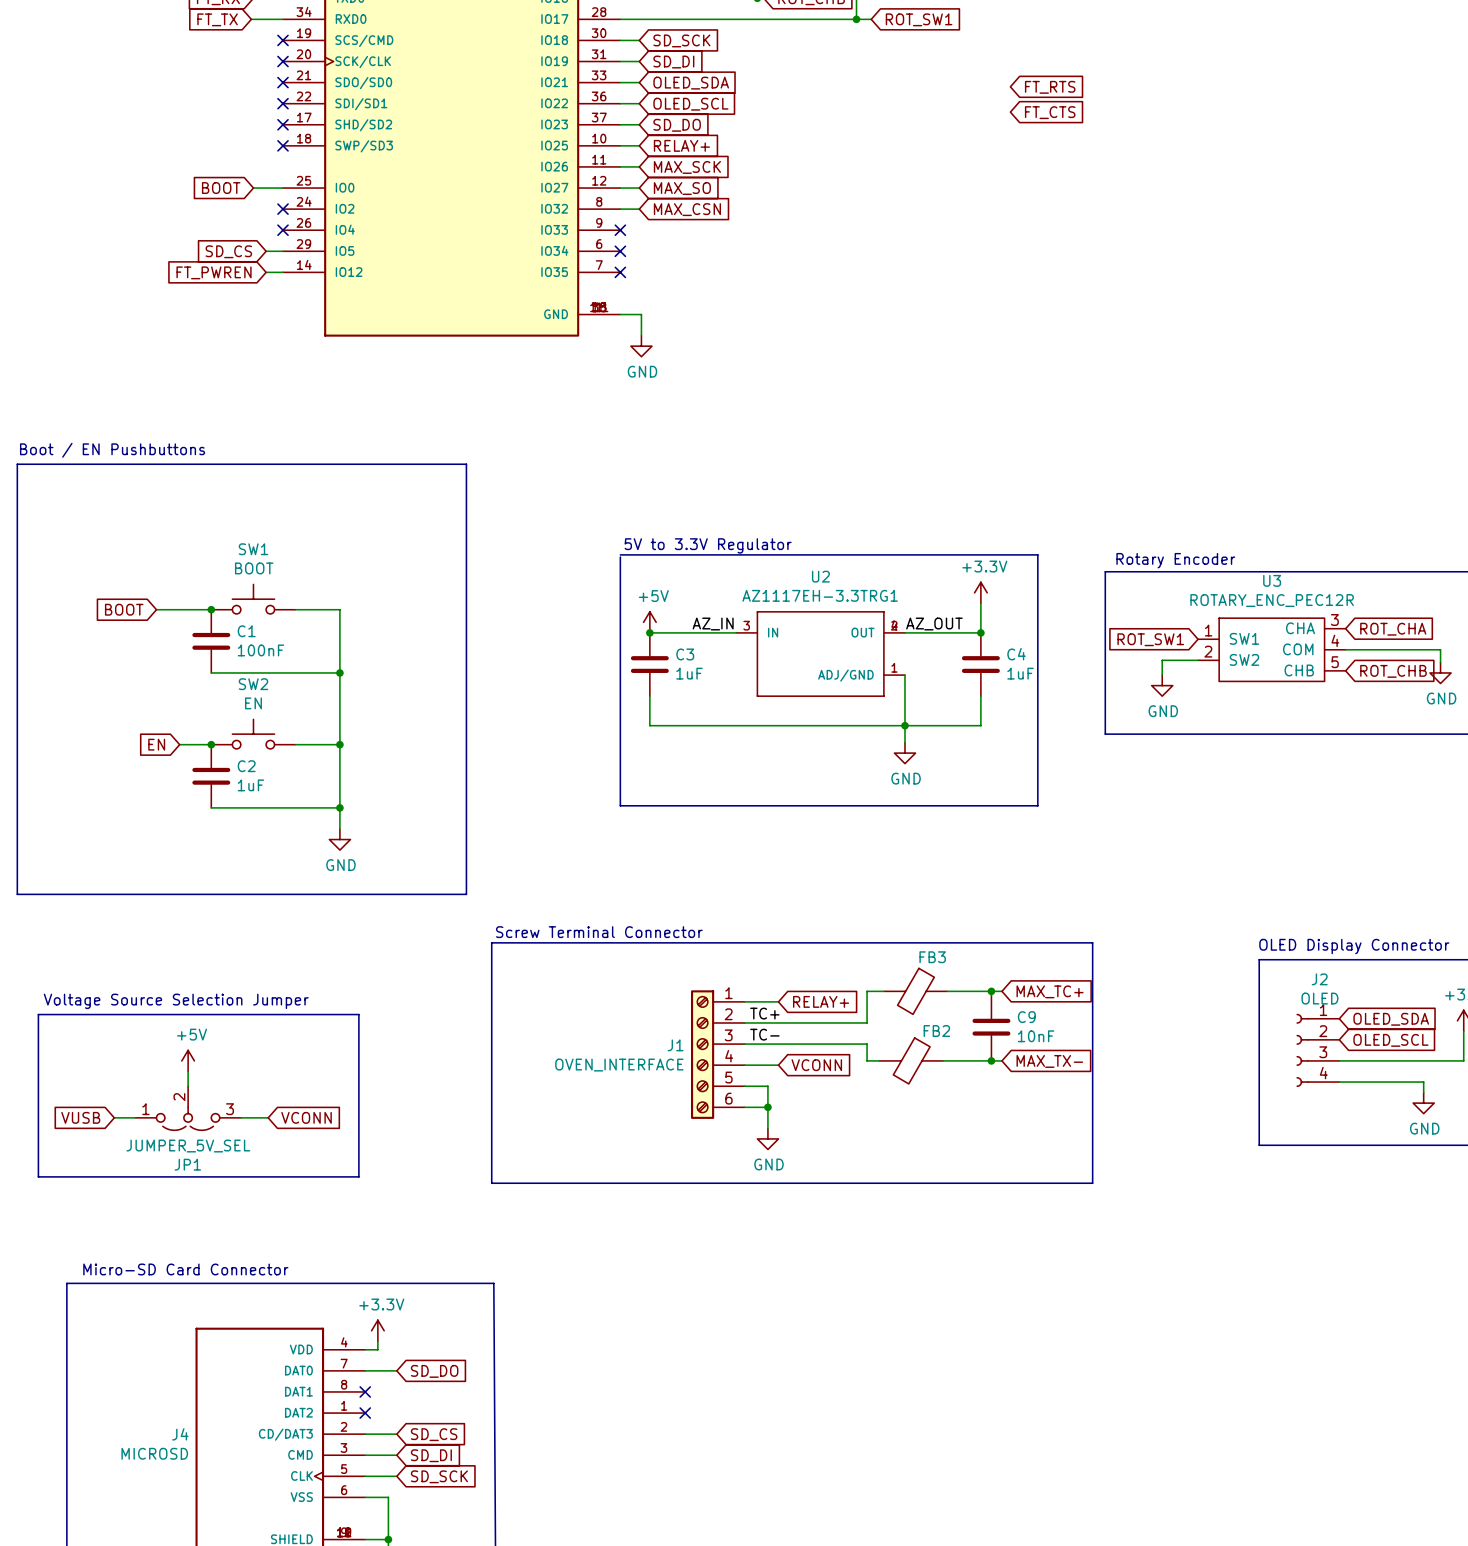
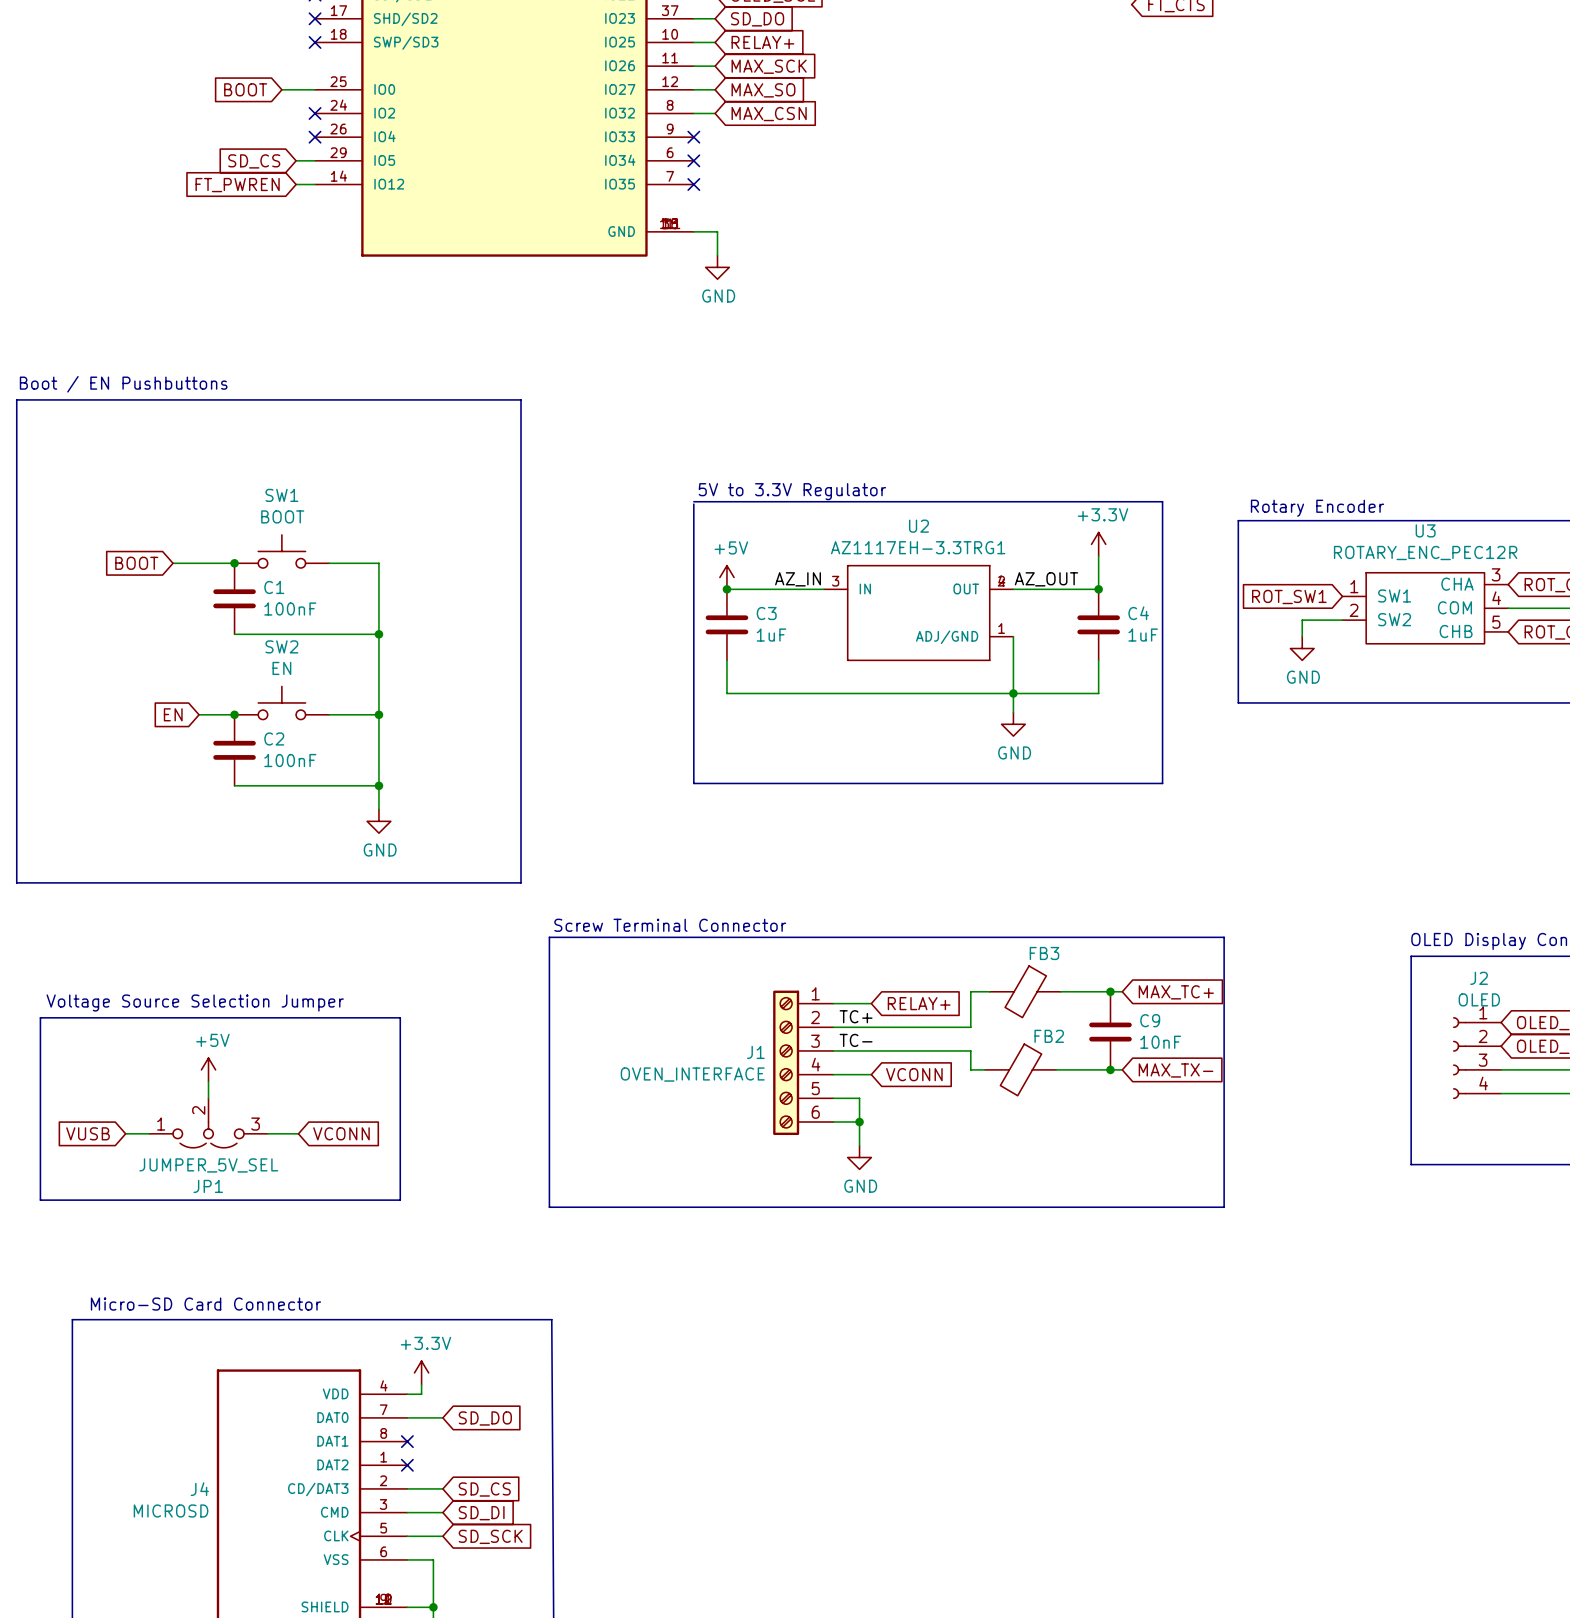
C2 value: 1uF (250, 785) -> 100nF (290, 760)

